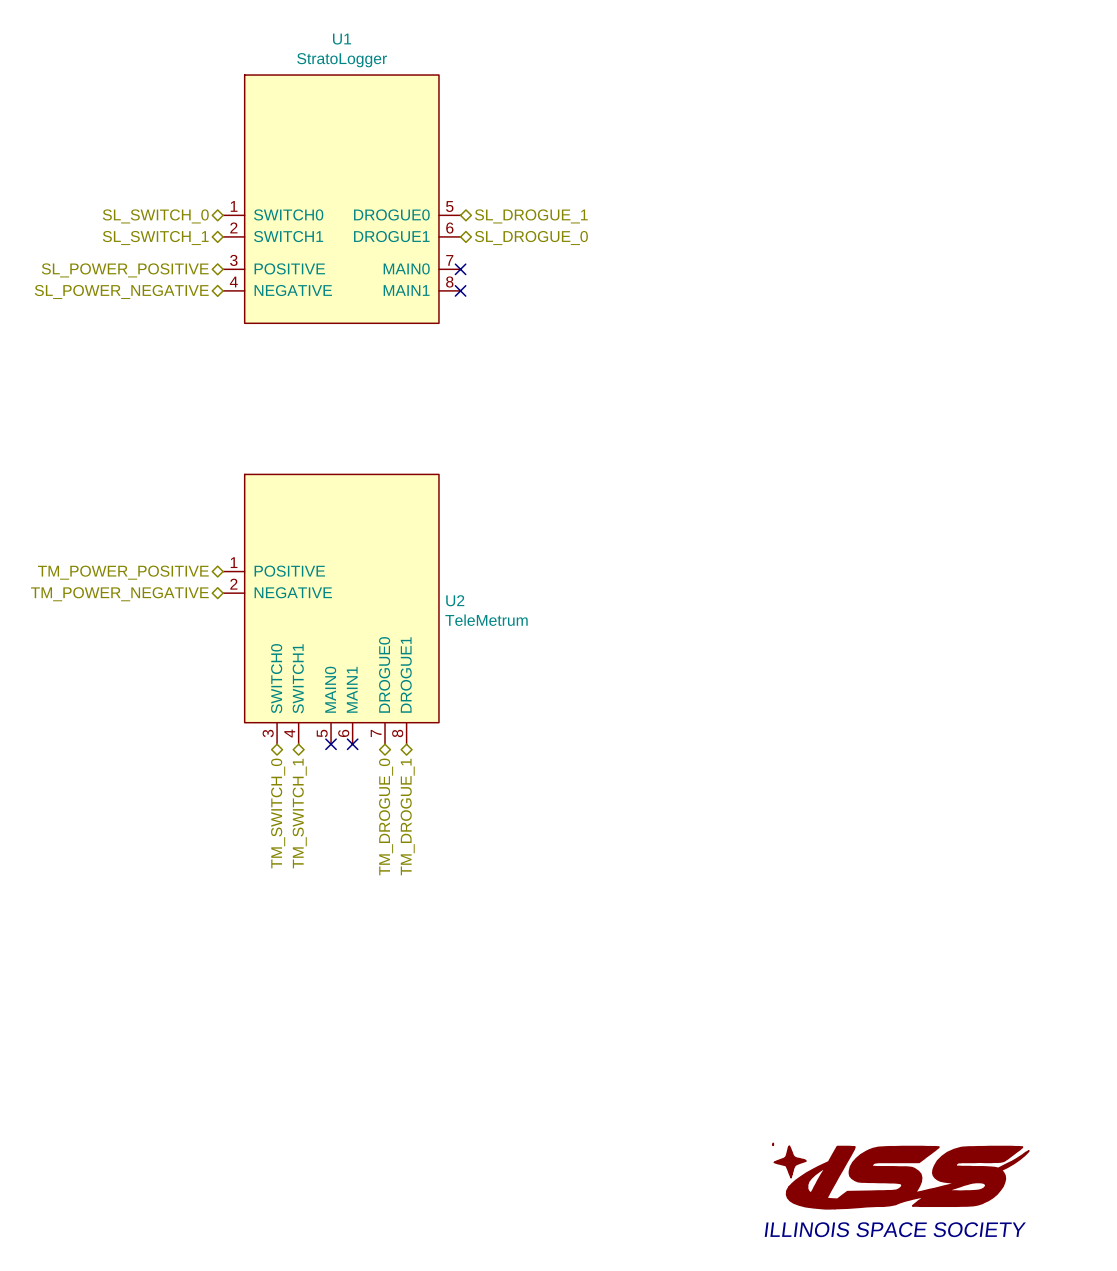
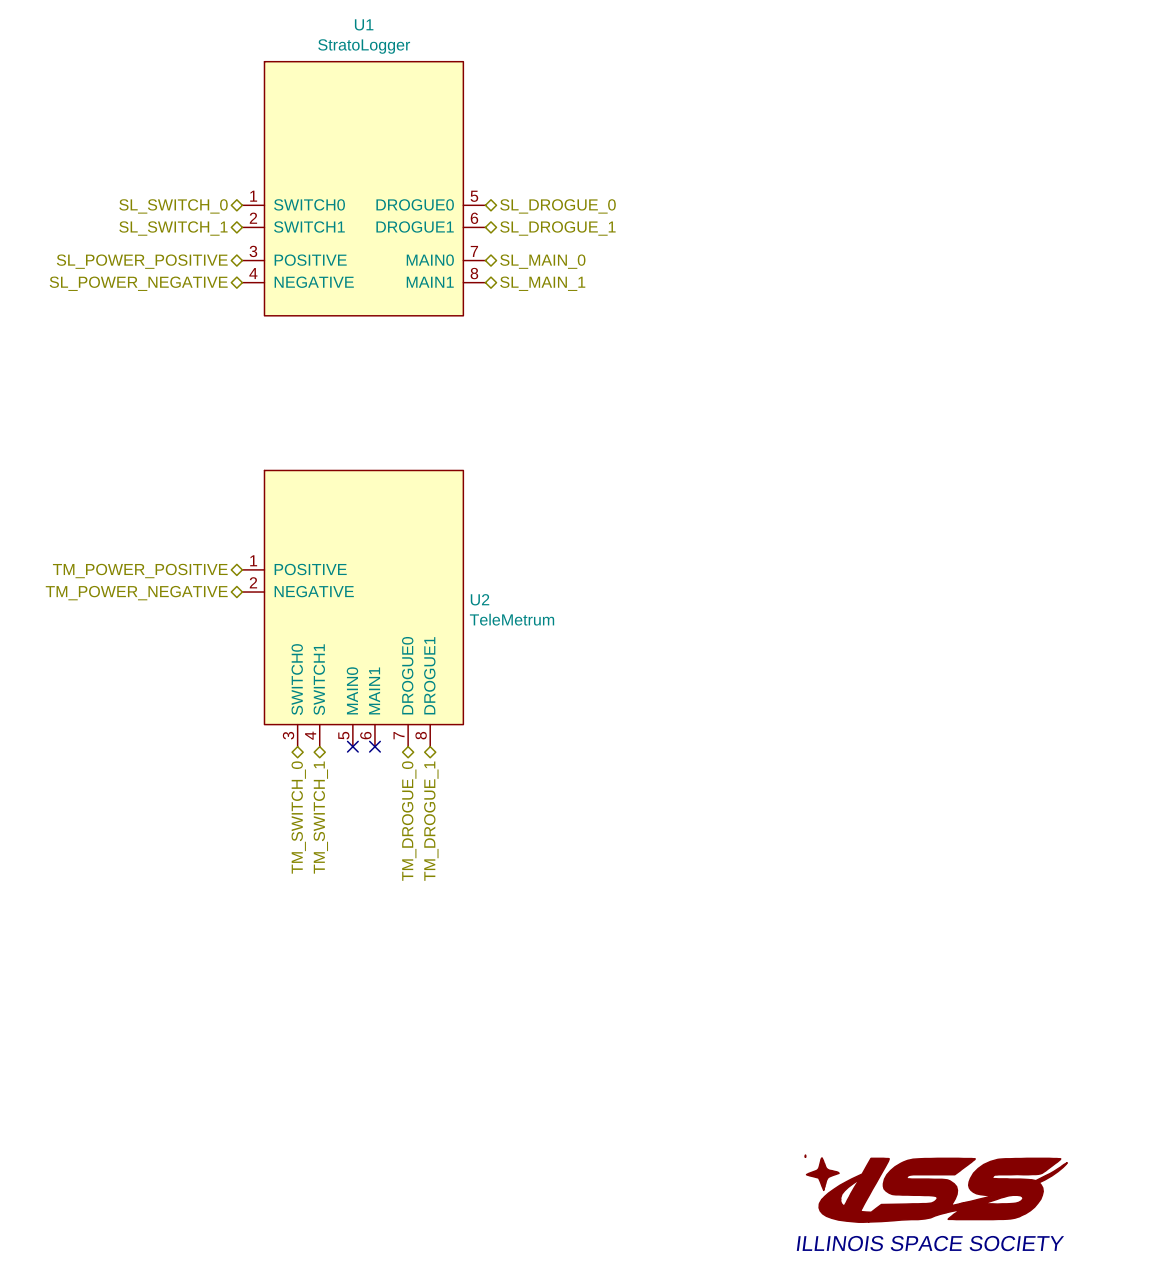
hierarchical label: SL_DROGUE_1 (531, 216) -> SL_DROGUE_0 (558, 206)
hierarchical label: SL_DROGUE_0 (531, 238) -> SL_DROGUE_1 (557, 228)
no-connect mark: (460, 269) -> none
hierarchical label: none -> SL_MAIN_0 (542, 261)
no-connect mark: (460, 290) -> none
hierarchical label: none -> SL_MAIN_1 (542, 283)

